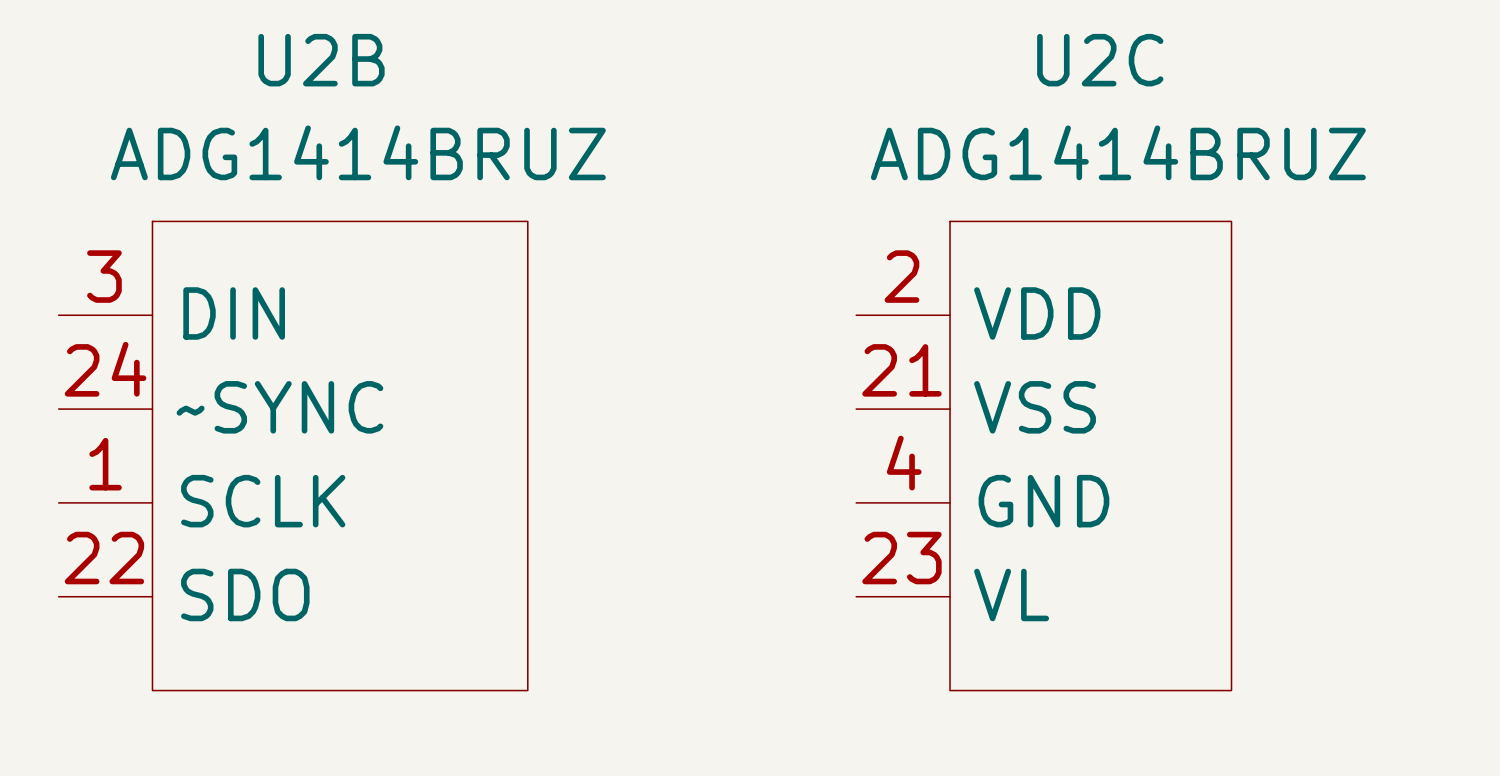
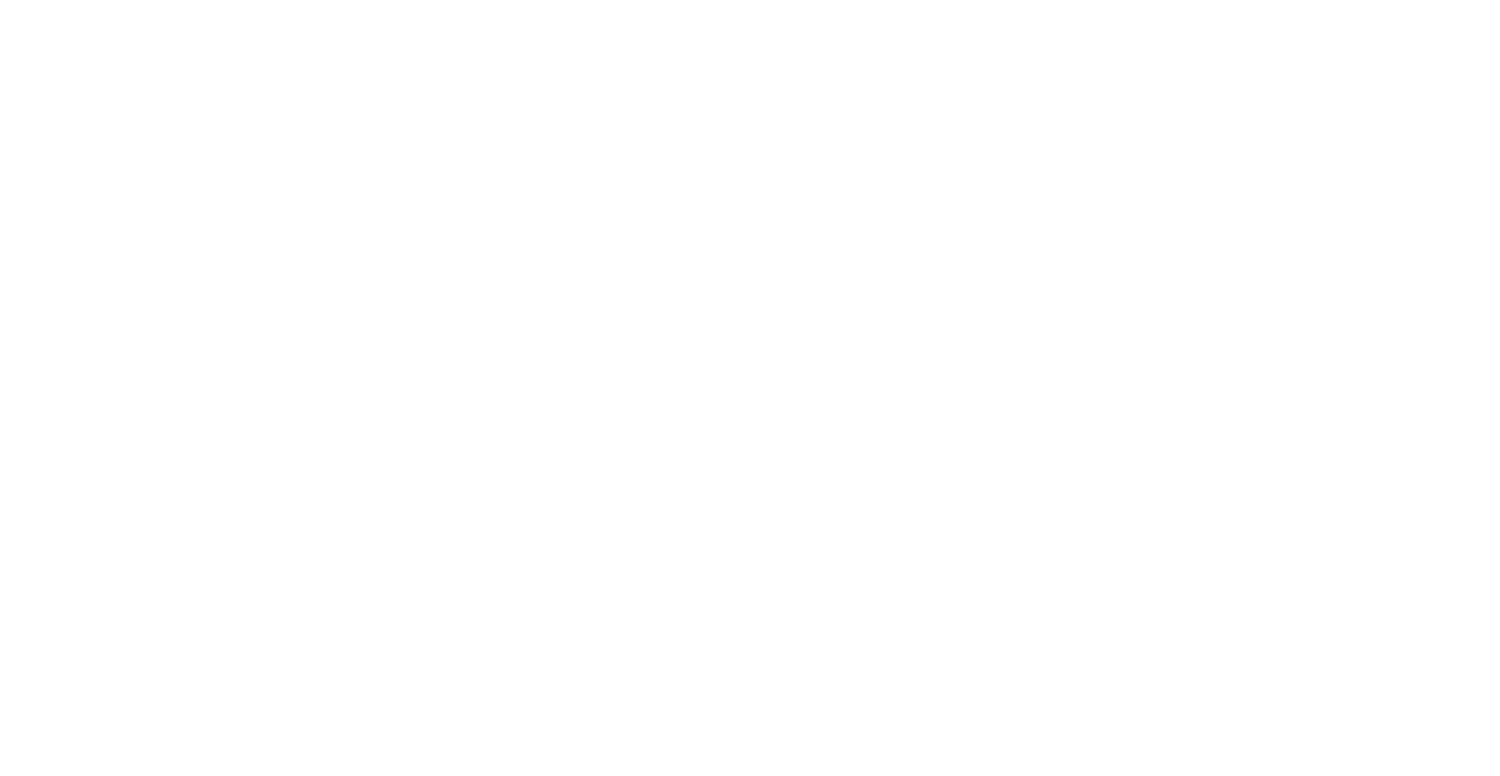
U2B: ADG1414BRUZ (293, 455) -> none
U2C: ADG1414BRUZ (1043, 455) -> none

